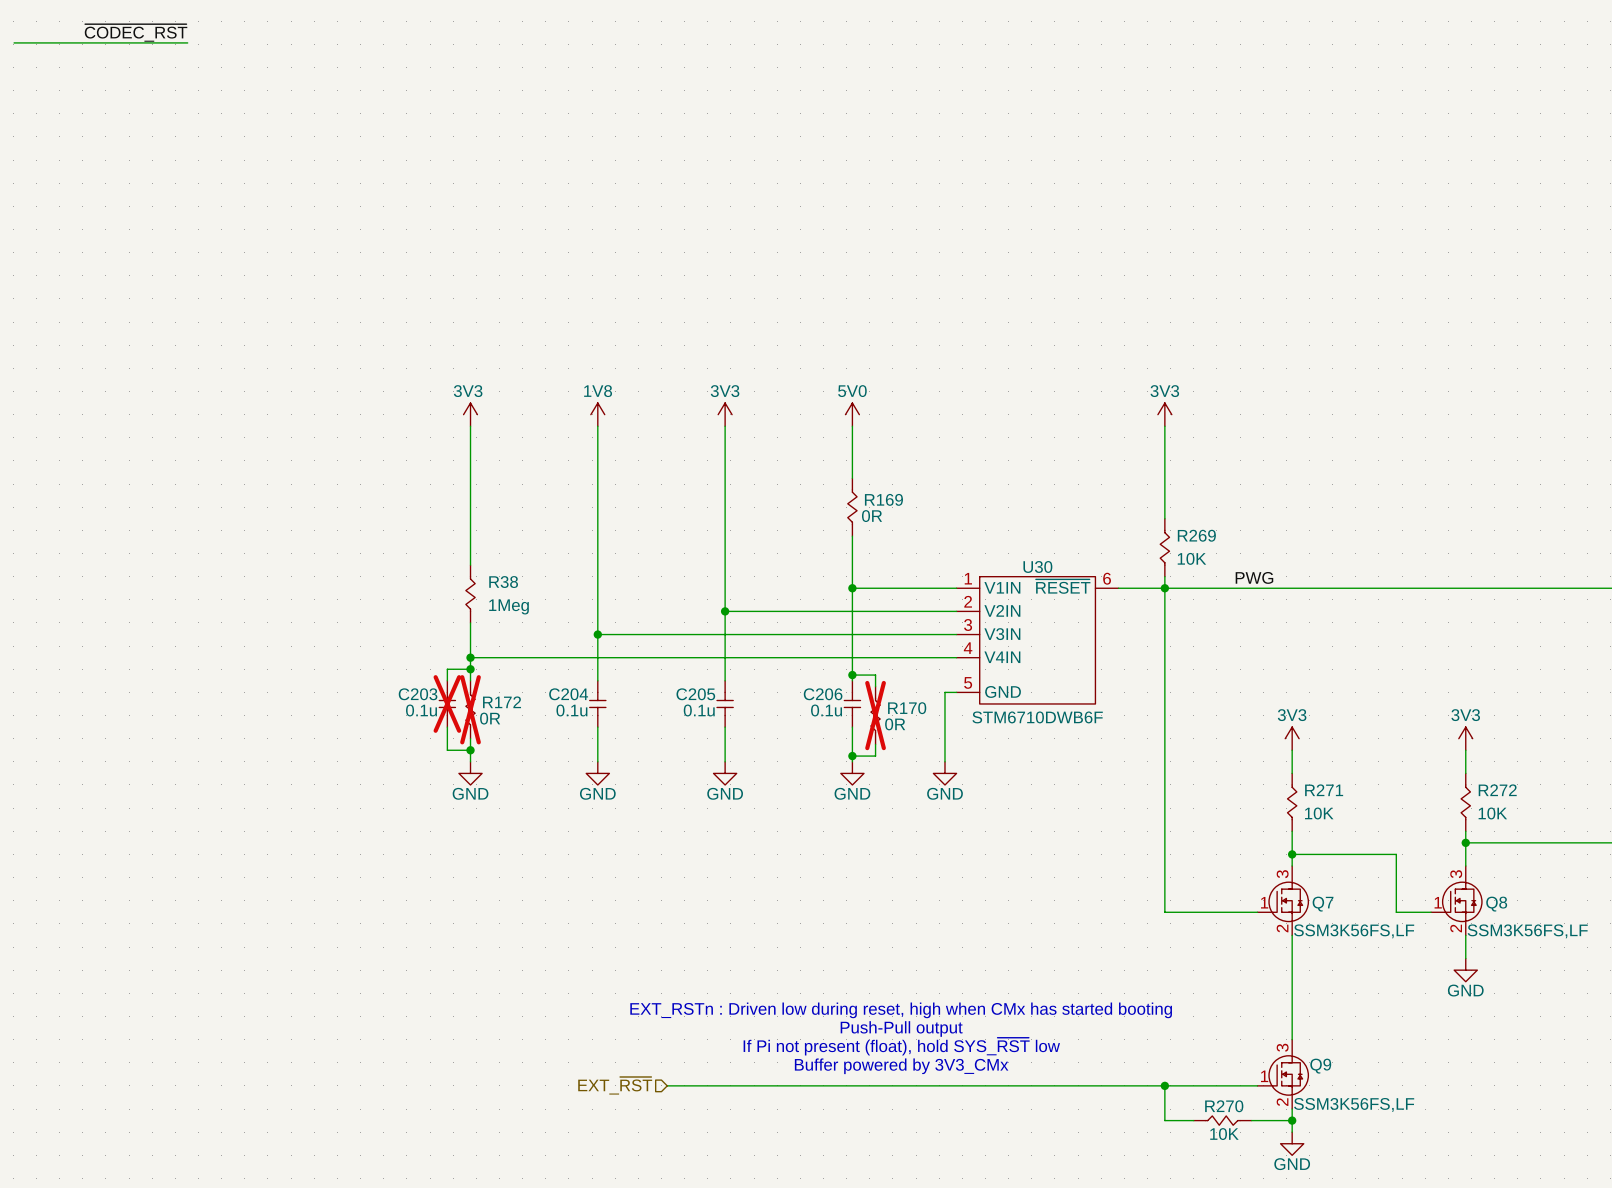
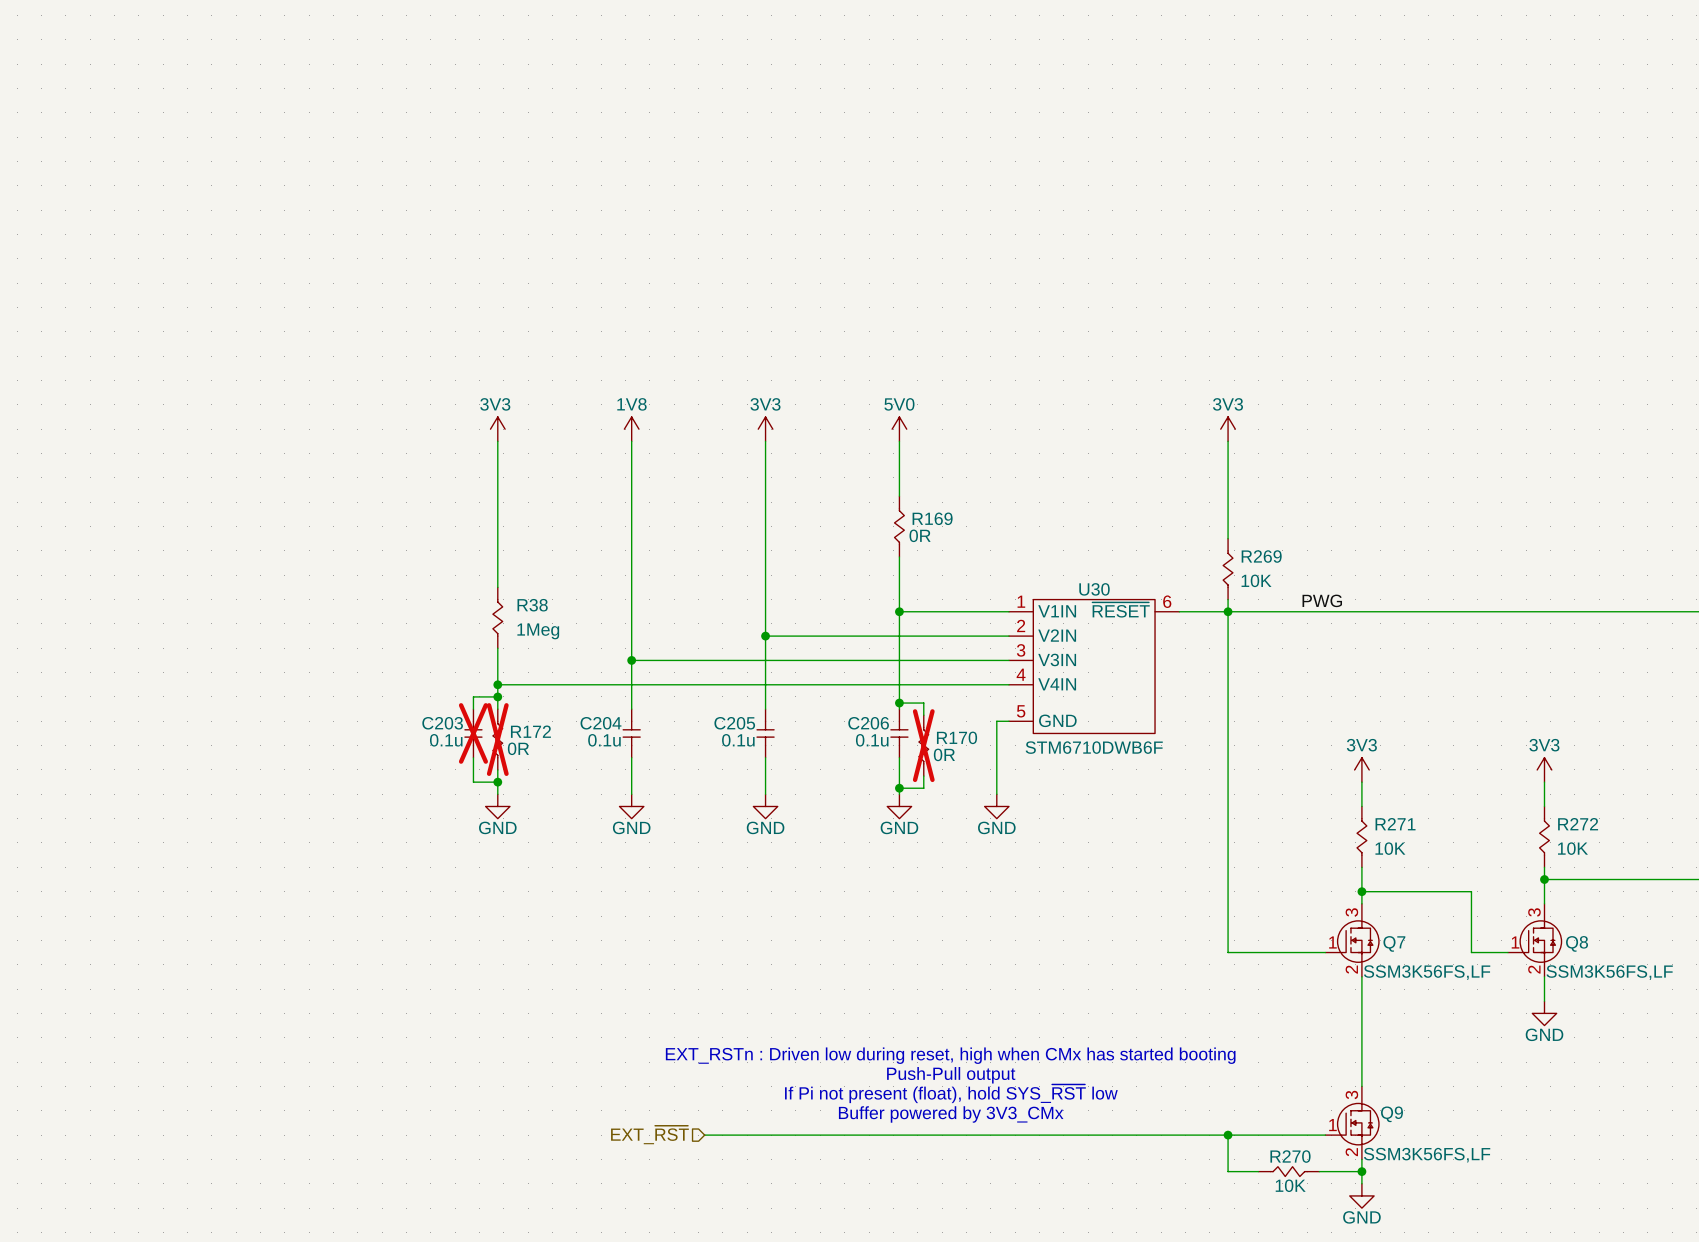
label: ~{CODEC_RST} (136, 32) -> none
wire: (14, 42) (187, 42) -> none

